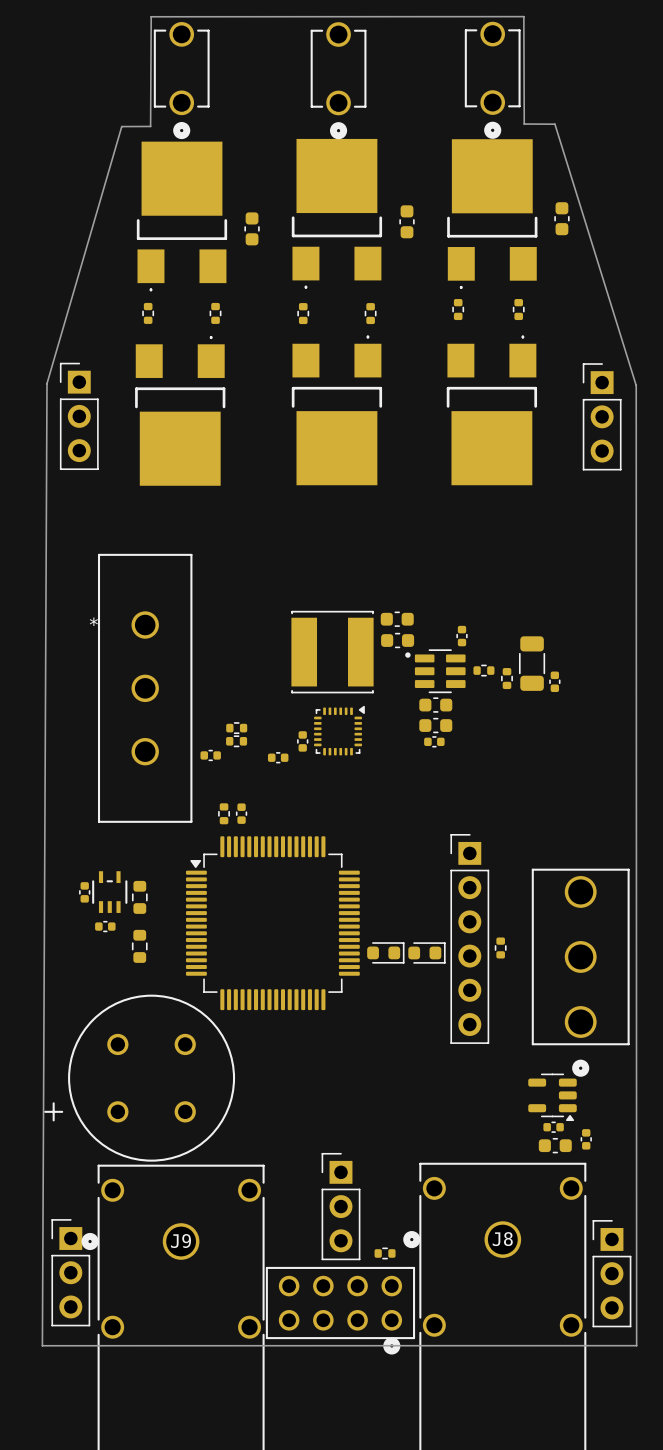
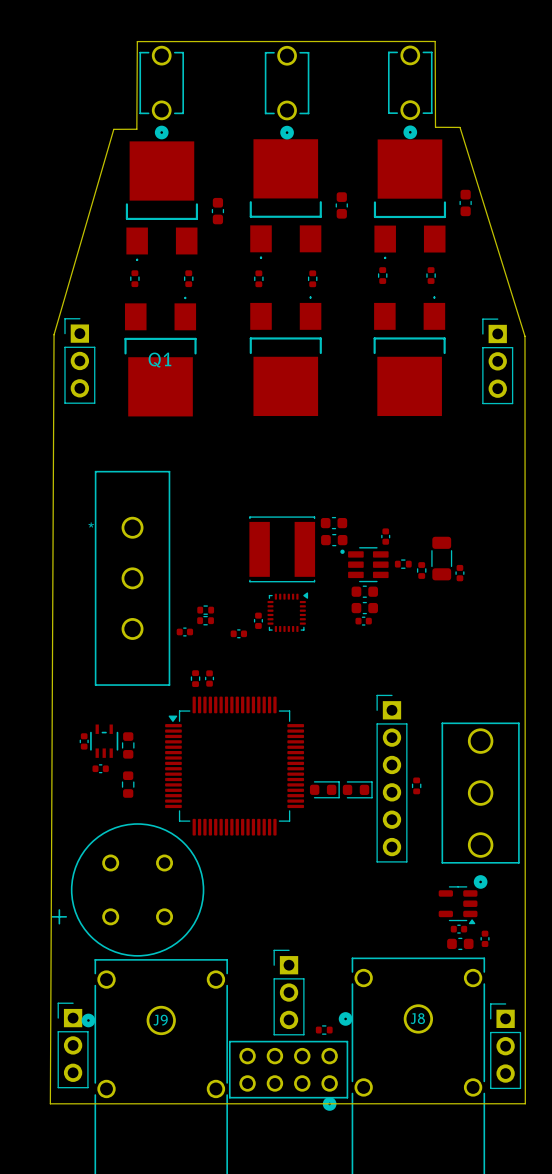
Q1 name: none -> Q1 (159, 360)

